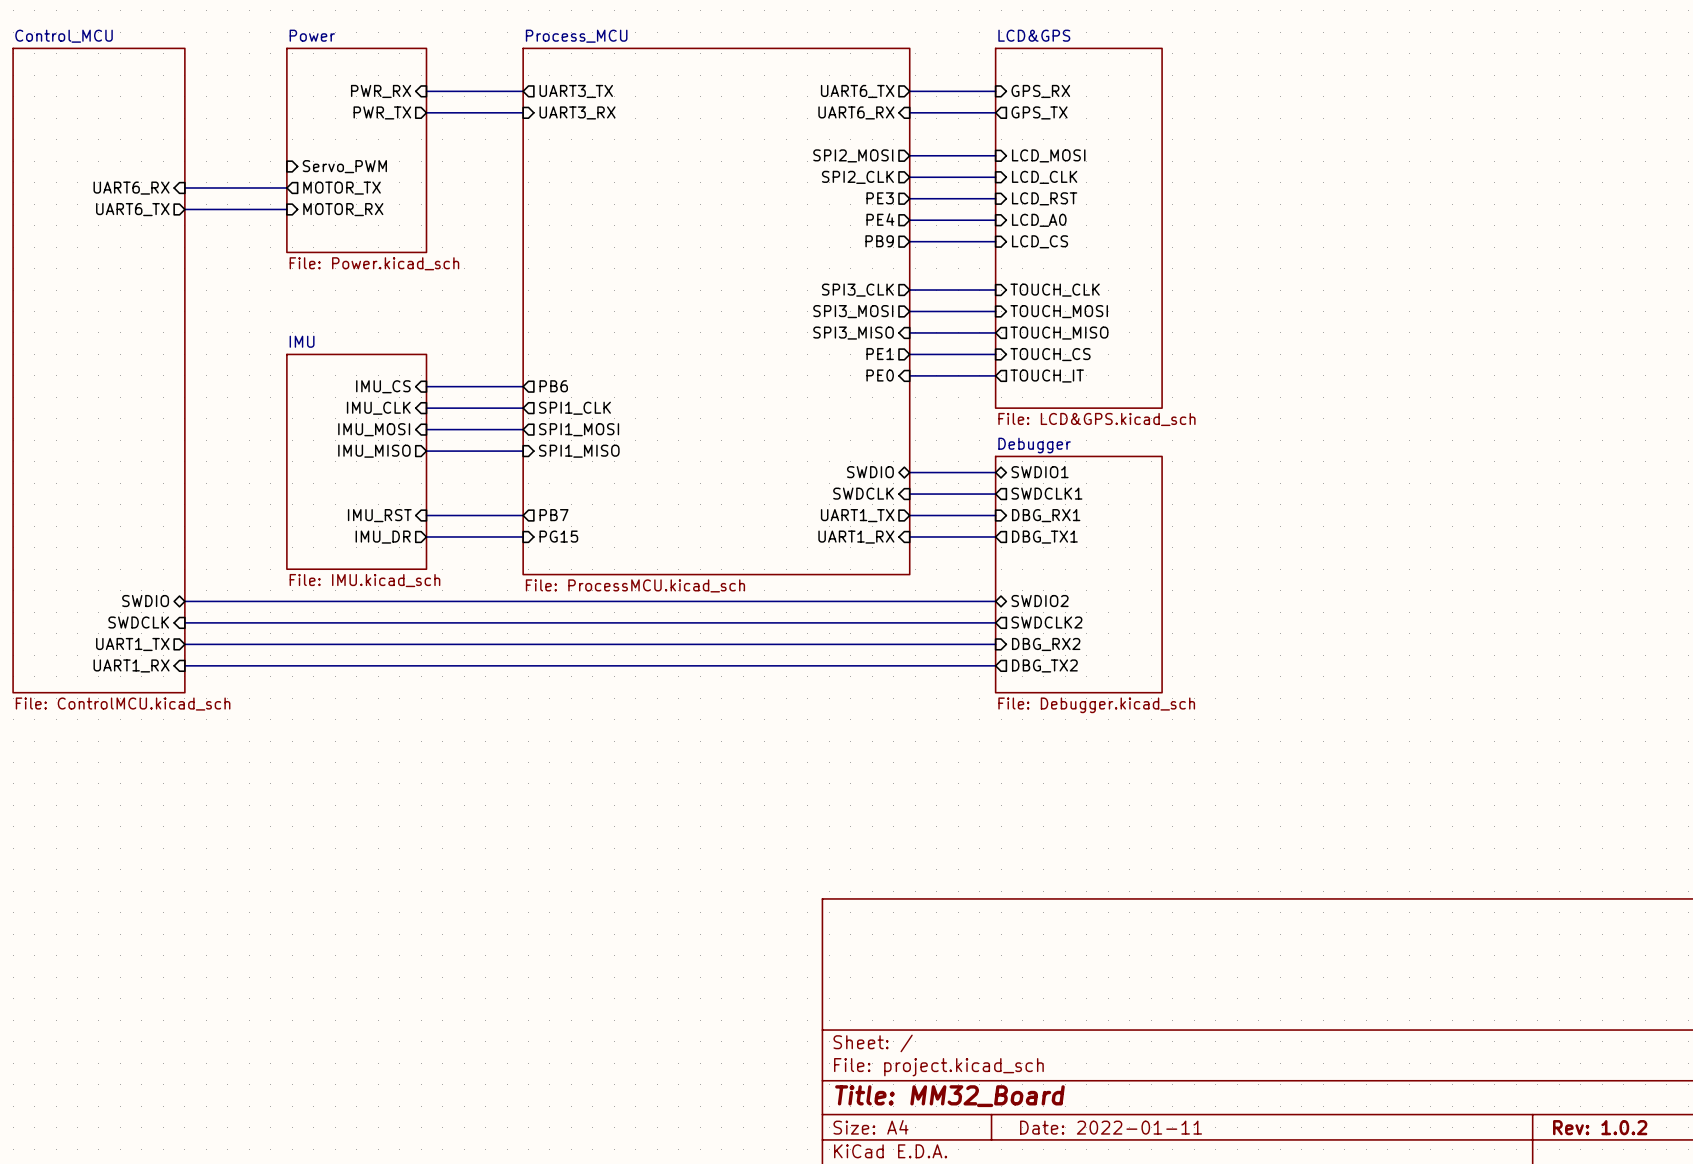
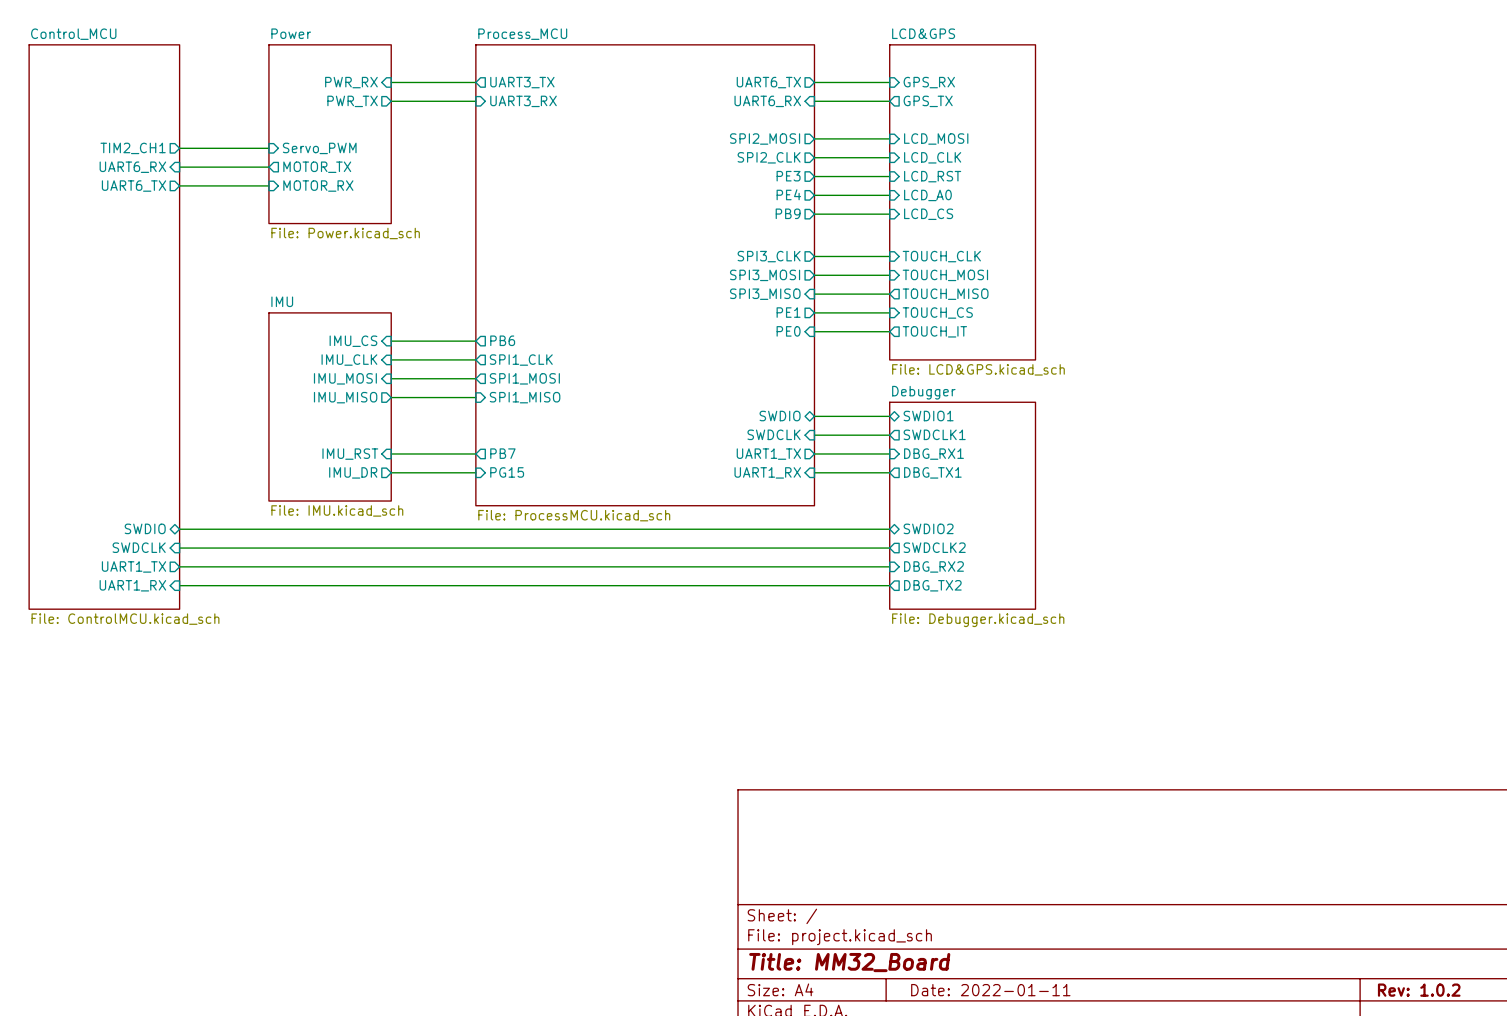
sheet pin: none -> TIM2_CH1 (133, 148)
wire: none -> (179, 148) (268, 148)

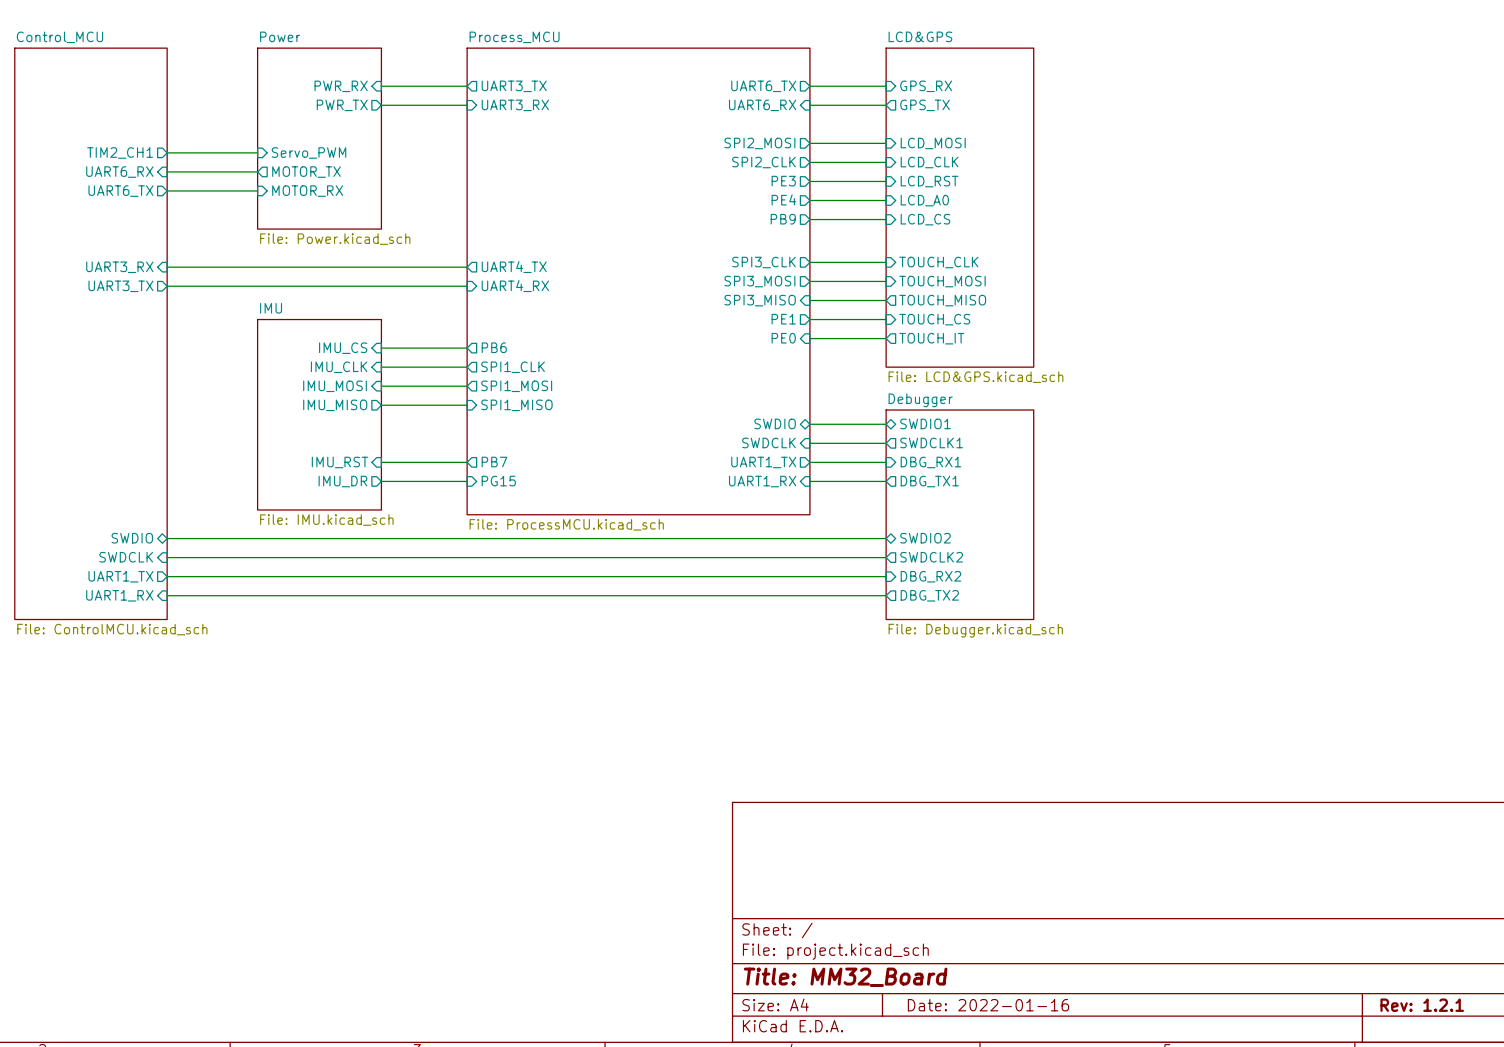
sheet pin: none -> UART3_RX (119, 267)
wire: none -> (167, 267) (467, 267)
sheet pin: none -> UART4_TX (514, 267)
wire: none -> (167, 286) (467, 286)
sheet pin: none -> UART4_RX (515, 286)
sheet pin: none -> UART3_TX (120, 286)
title block: Date: 2022-01-11 (990, 990) -> Date: 2022-01-16 (988, 1005)
title block: Rev: 1.0.2 (1419, 990) -> Rev: 1.2.1 (1422, 1005)

